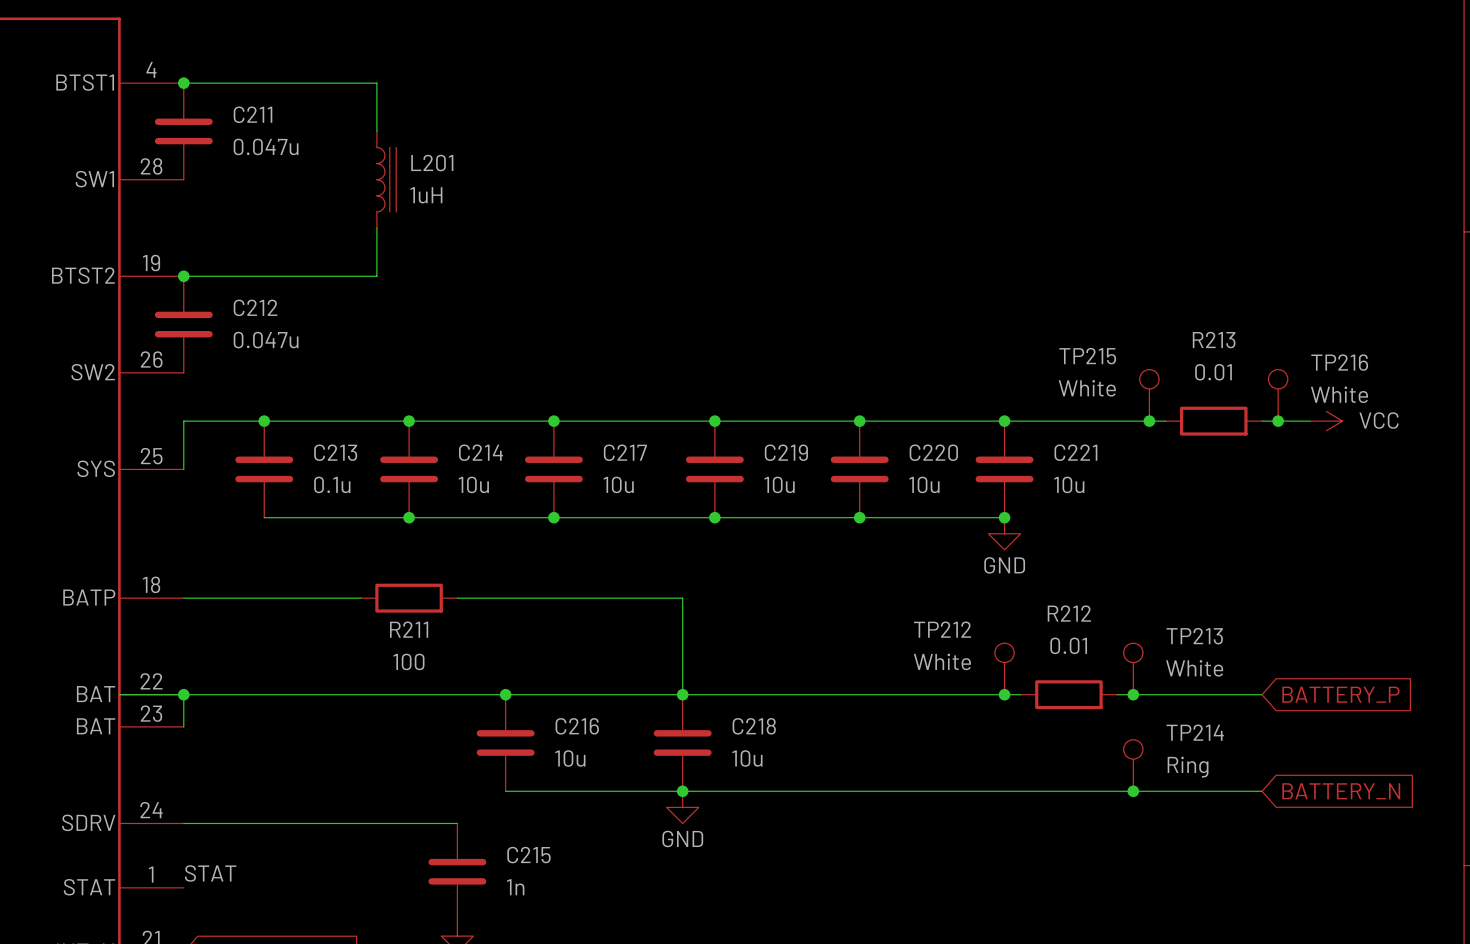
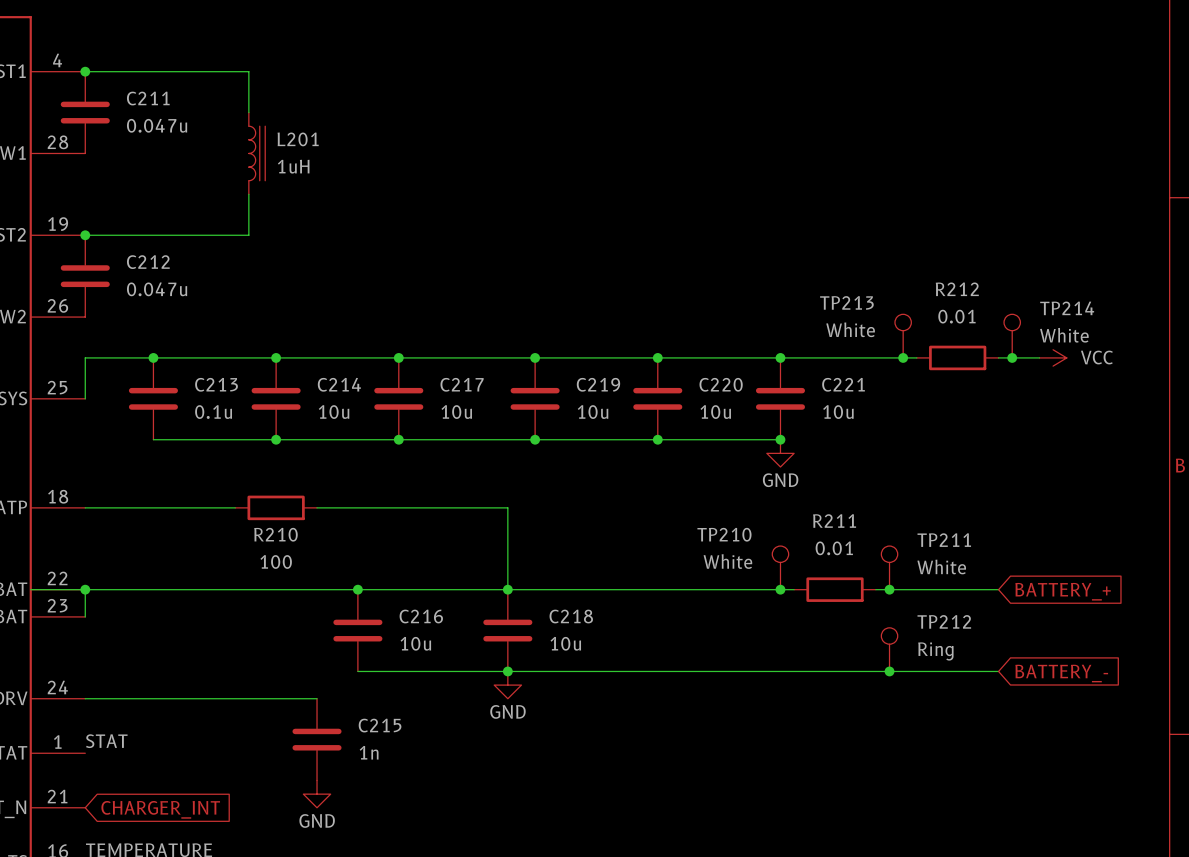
R213 name: R213 (1214, 340) -> R212 (957, 289)
TP215 name: TP215 (1087, 356) -> TP213 (846, 302)
TP216 name: TP216 (1339, 362) -> TP214 (1067, 308)
R212 name: R212 (1069, 613) -> R211 (834, 521)
R211 name: R211 (409, 629) -> R210 (275, 534)
TP212 name: TP212 (942, 629) -> TP210 (724, 534)
TP213 name: TP213 (1194, 636) -> TP211 (944, 540)
global label: BATTERY_P (1340, 694) -> BATTERY_+ (1063, 591)
TP214 name: TP214 (1195, 732) -> TP212 (944, 621)
global label: BATTERY_N (1341, 791) -> BATTERY_- (1061, 673)

